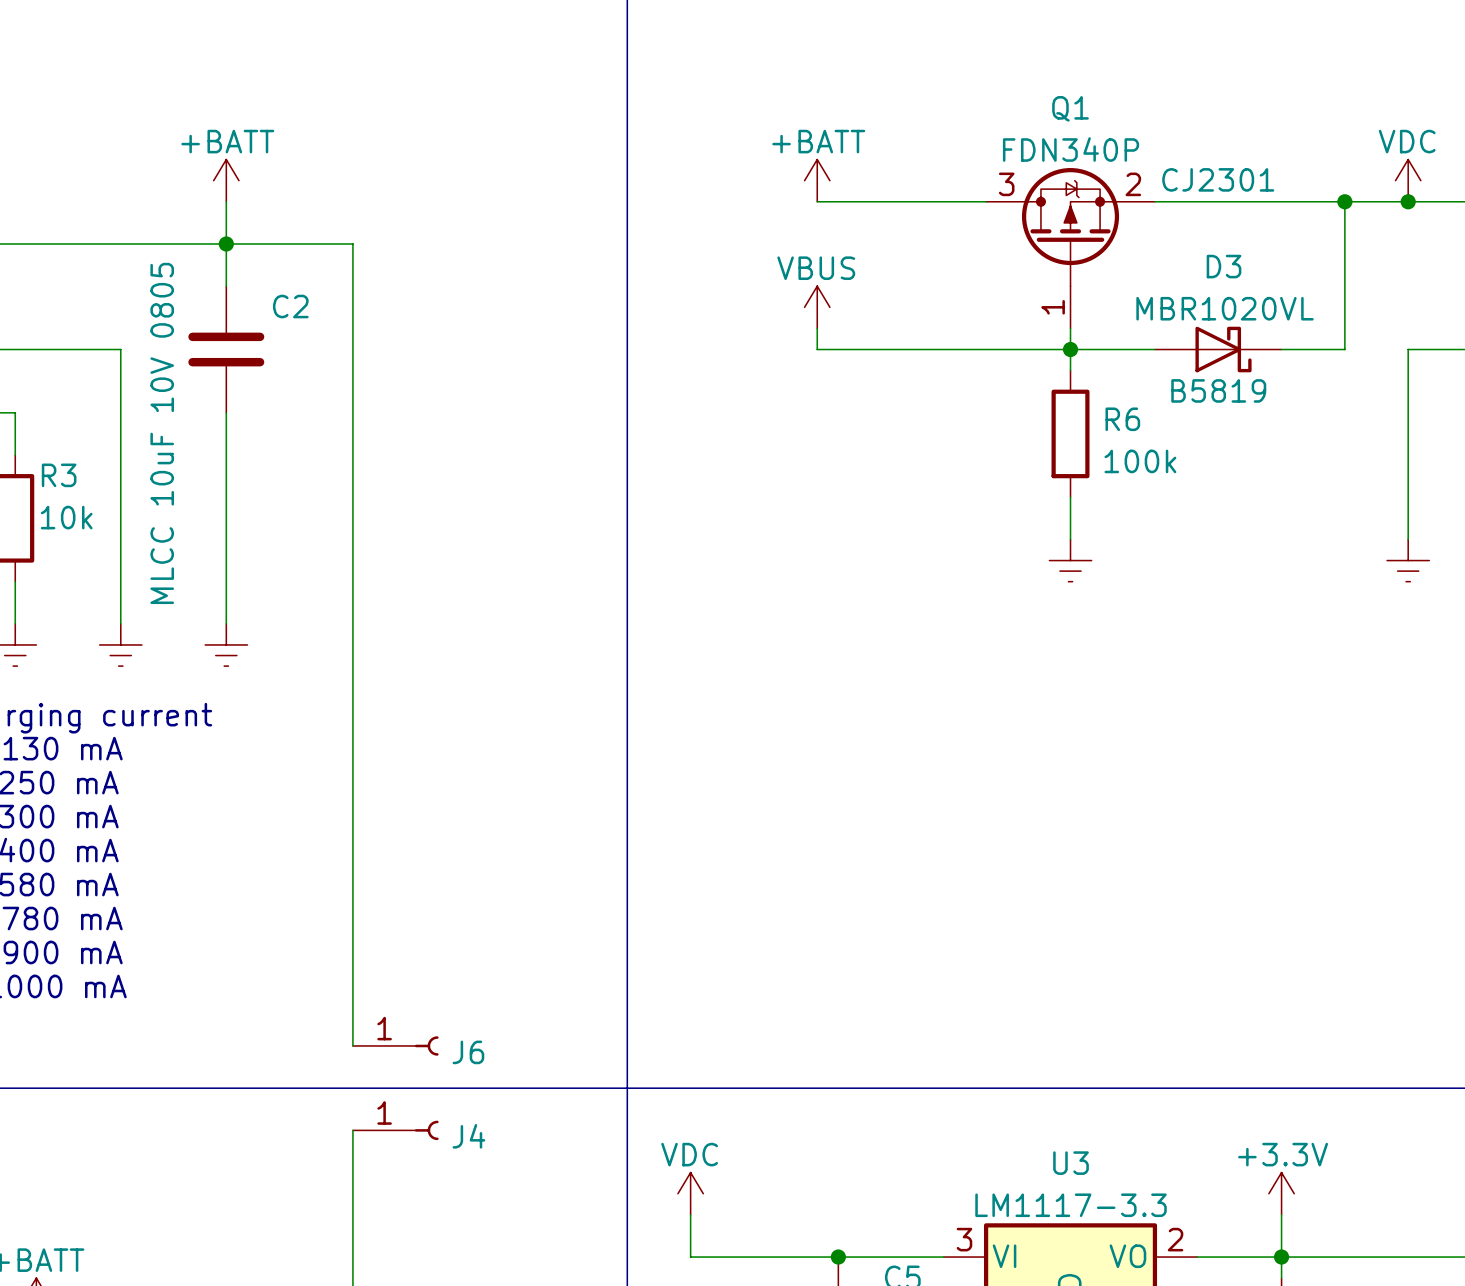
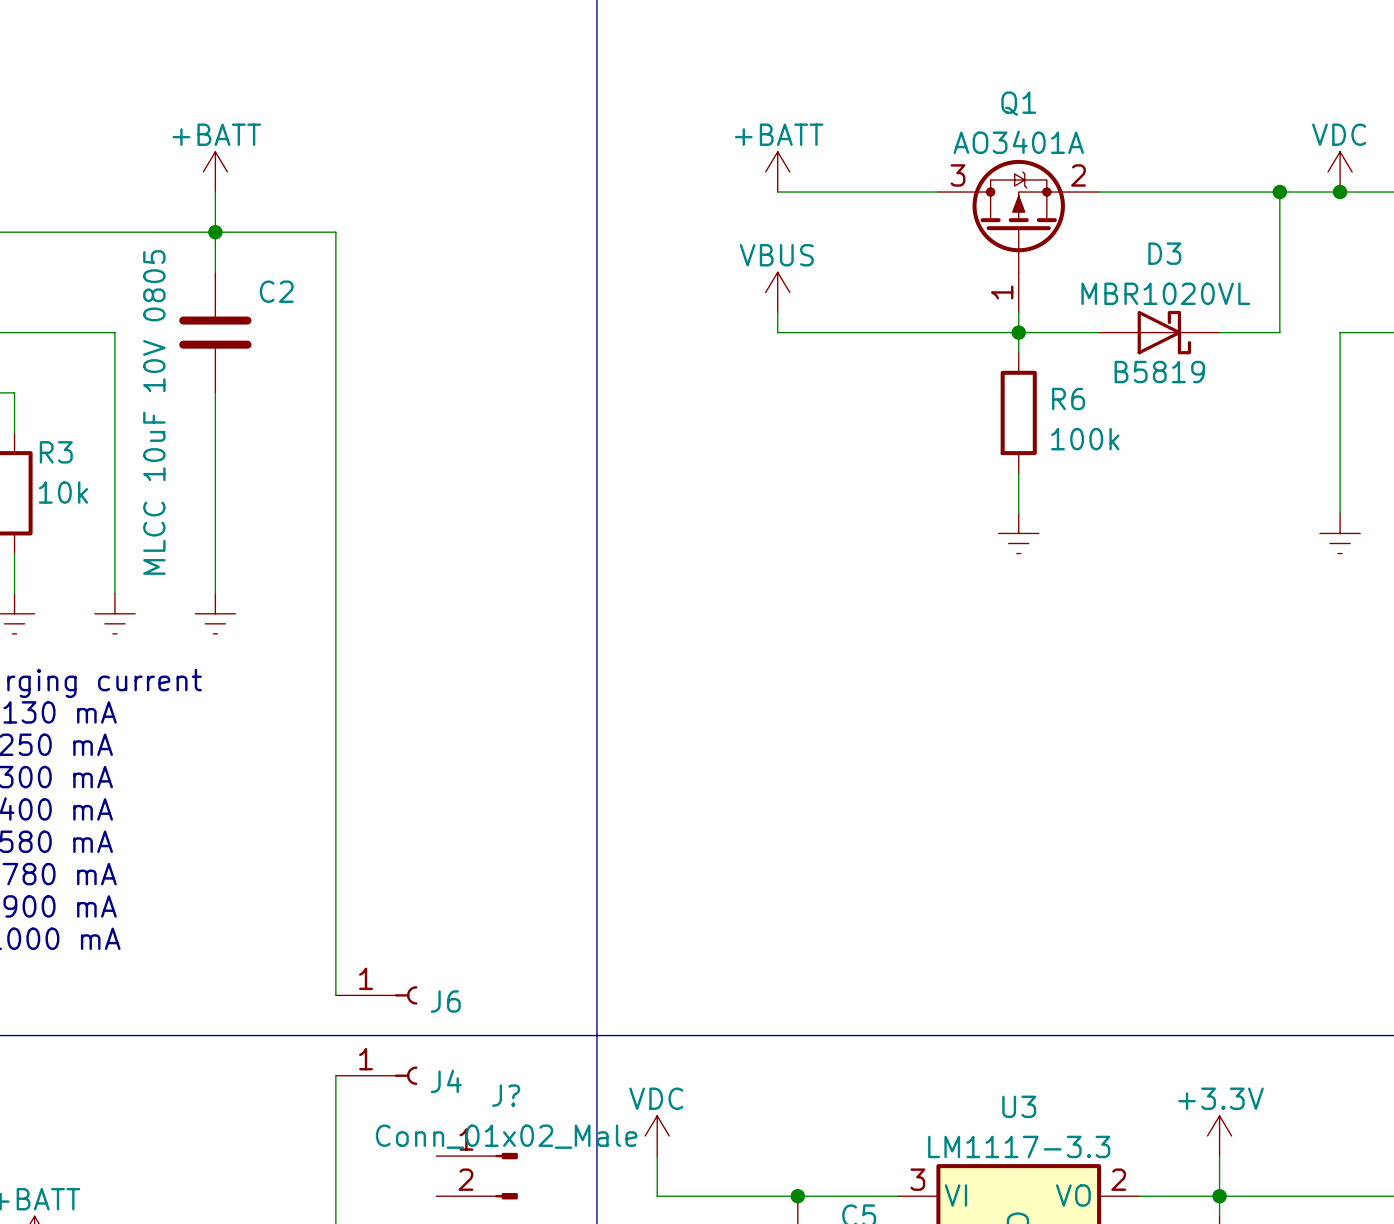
Q1 value: FDN340P (1071, 149) -> AO3401A (1018, 142)
Q1 text: CJ2301 (1218, 179) -> none
J?: none -> Conn_01x02_Male (477, 1176)

